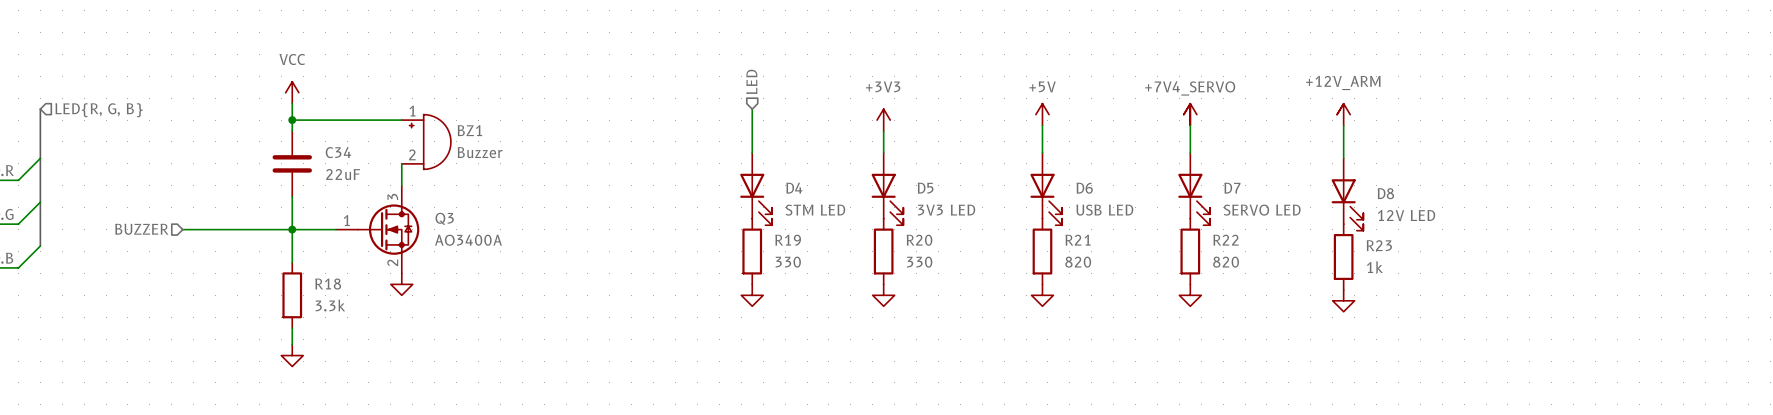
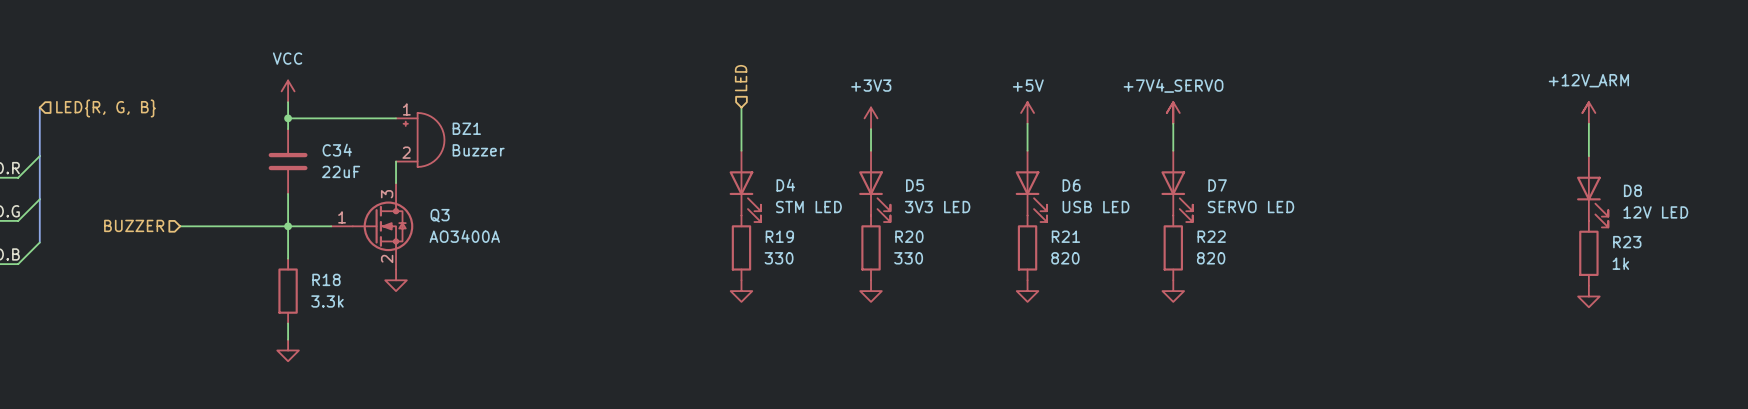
power symbol: +12V_ARM (1343, 114) -> none
power symbol: none -> +12V_ARM (1588, 112)
wire: (1343, 125) (1343, 158) -> none
wire: none -> (1588, 123) (1588, 156)
D8 position: (1347, 194) -> (1592, 191)
R23 position: (1343, 256) -> (1588, 253)
power symbol: (1343, 300) -> none
power symbol: none -> (1588, 296)

